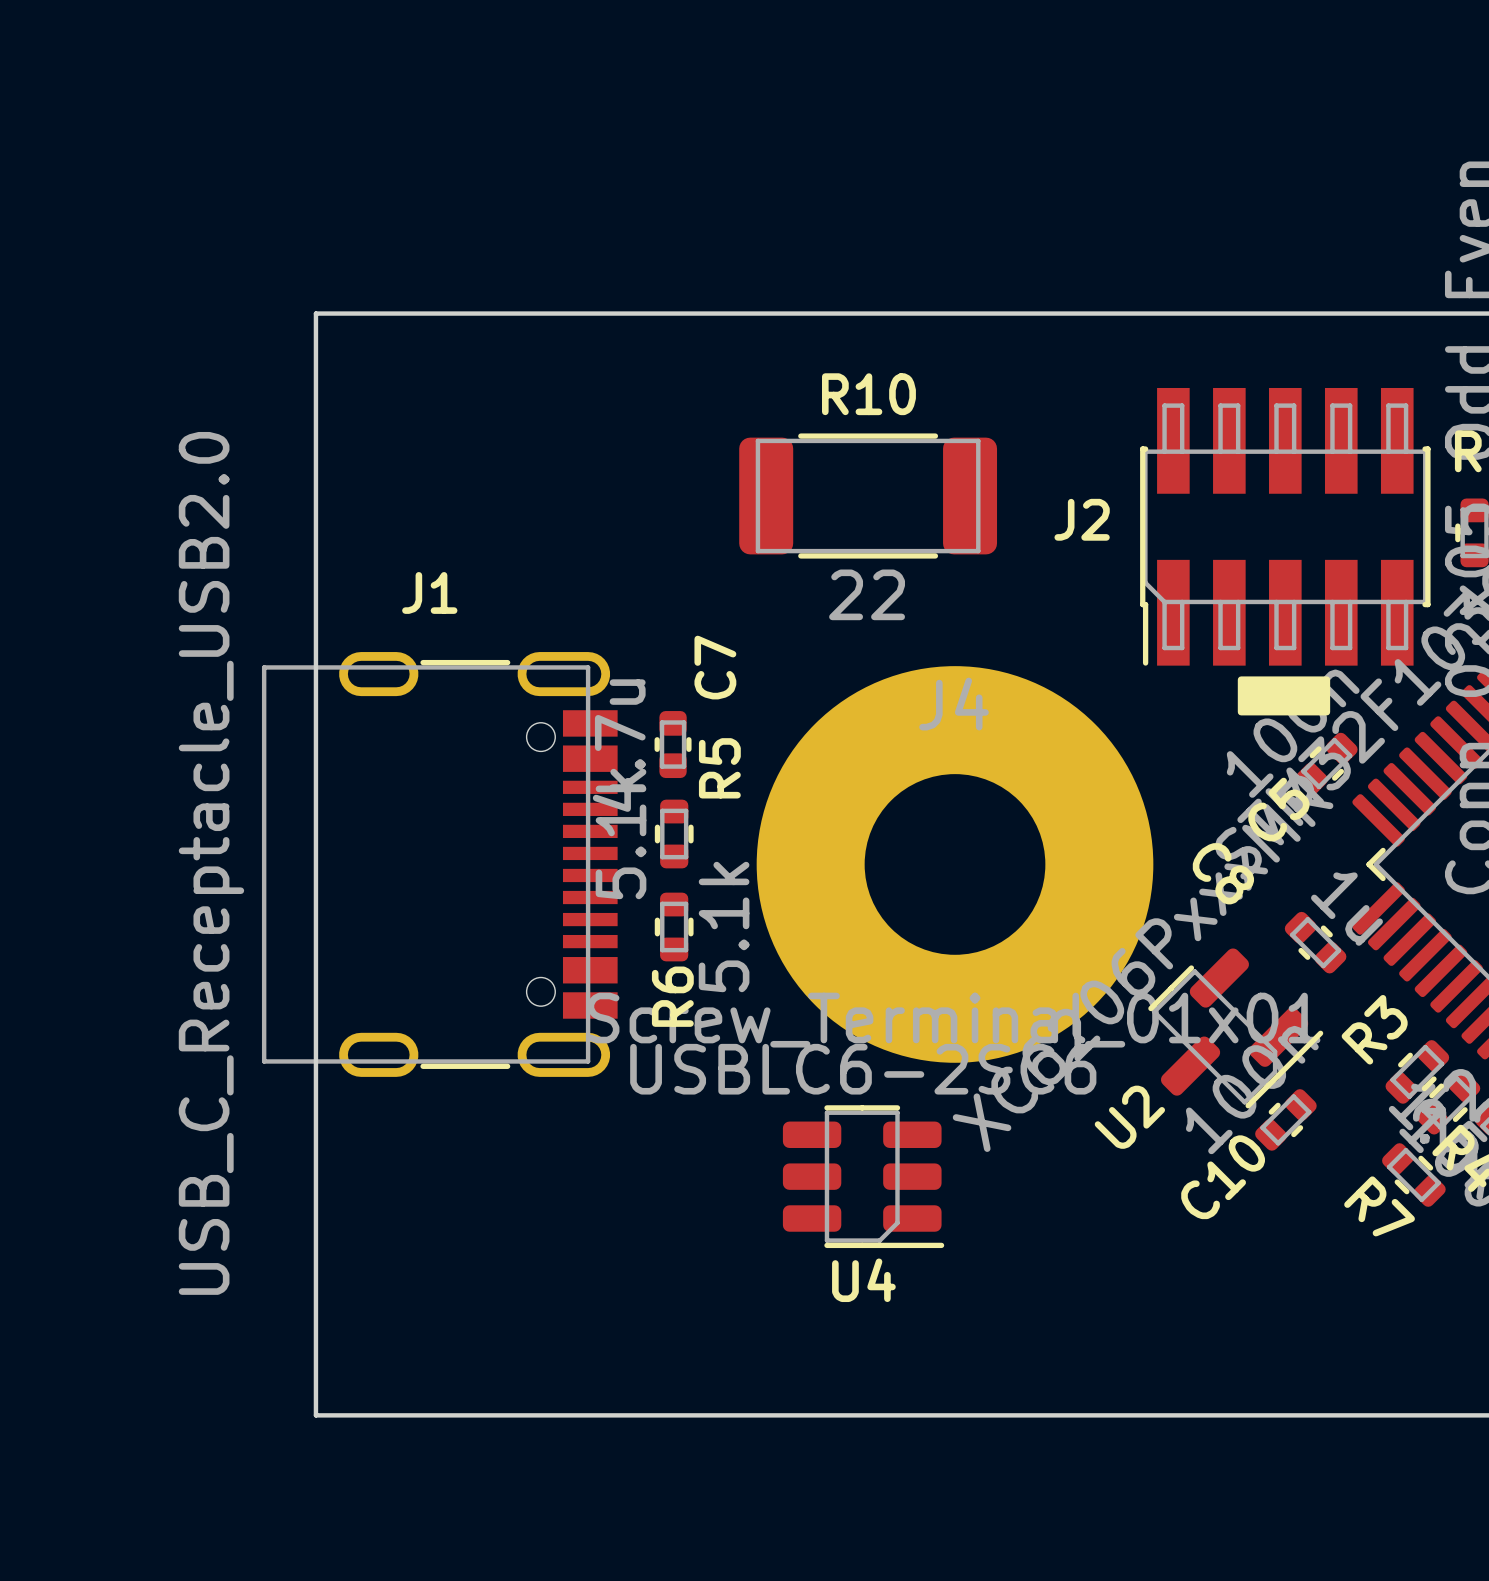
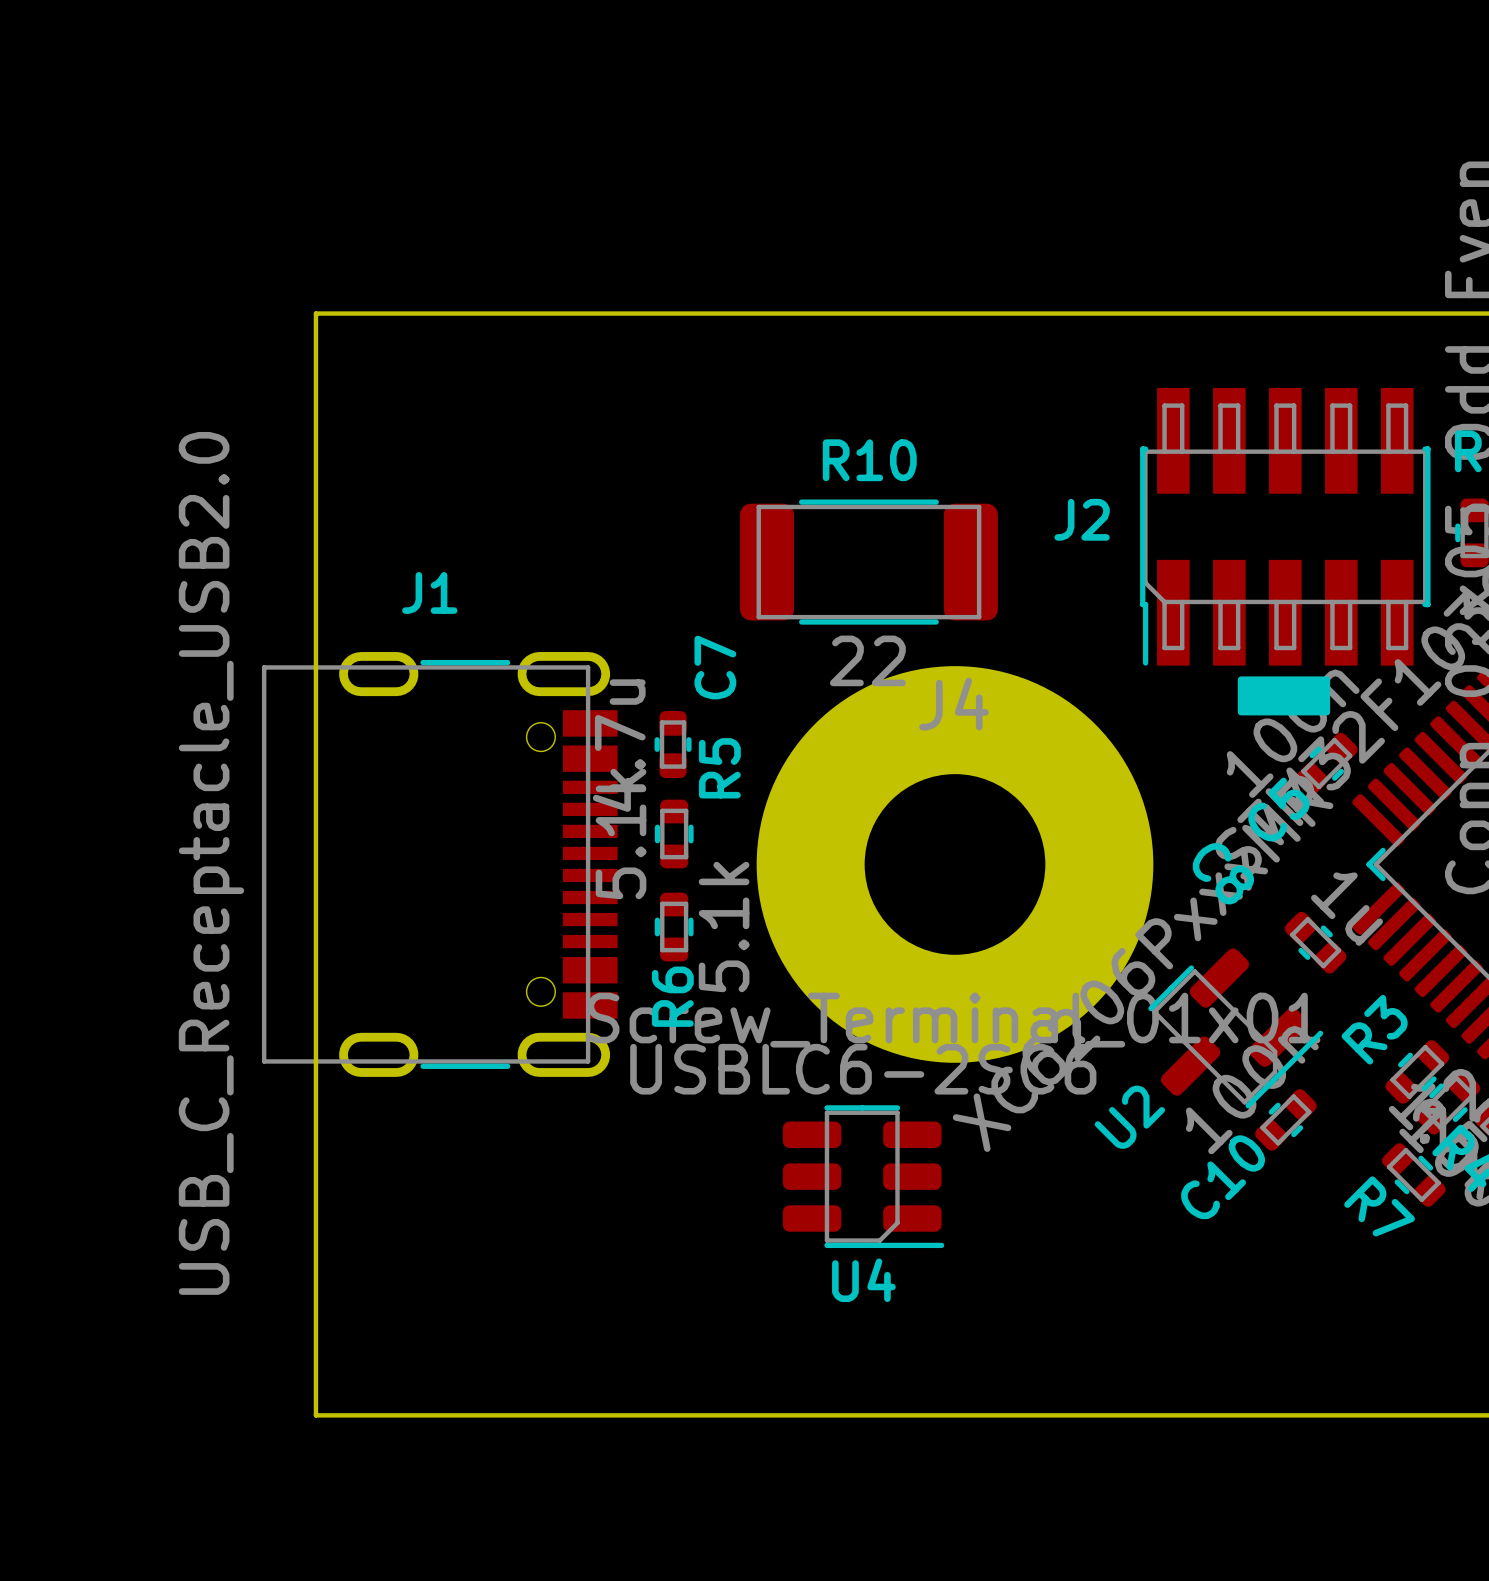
R10 position: (868, 496) -> (868, 562)

